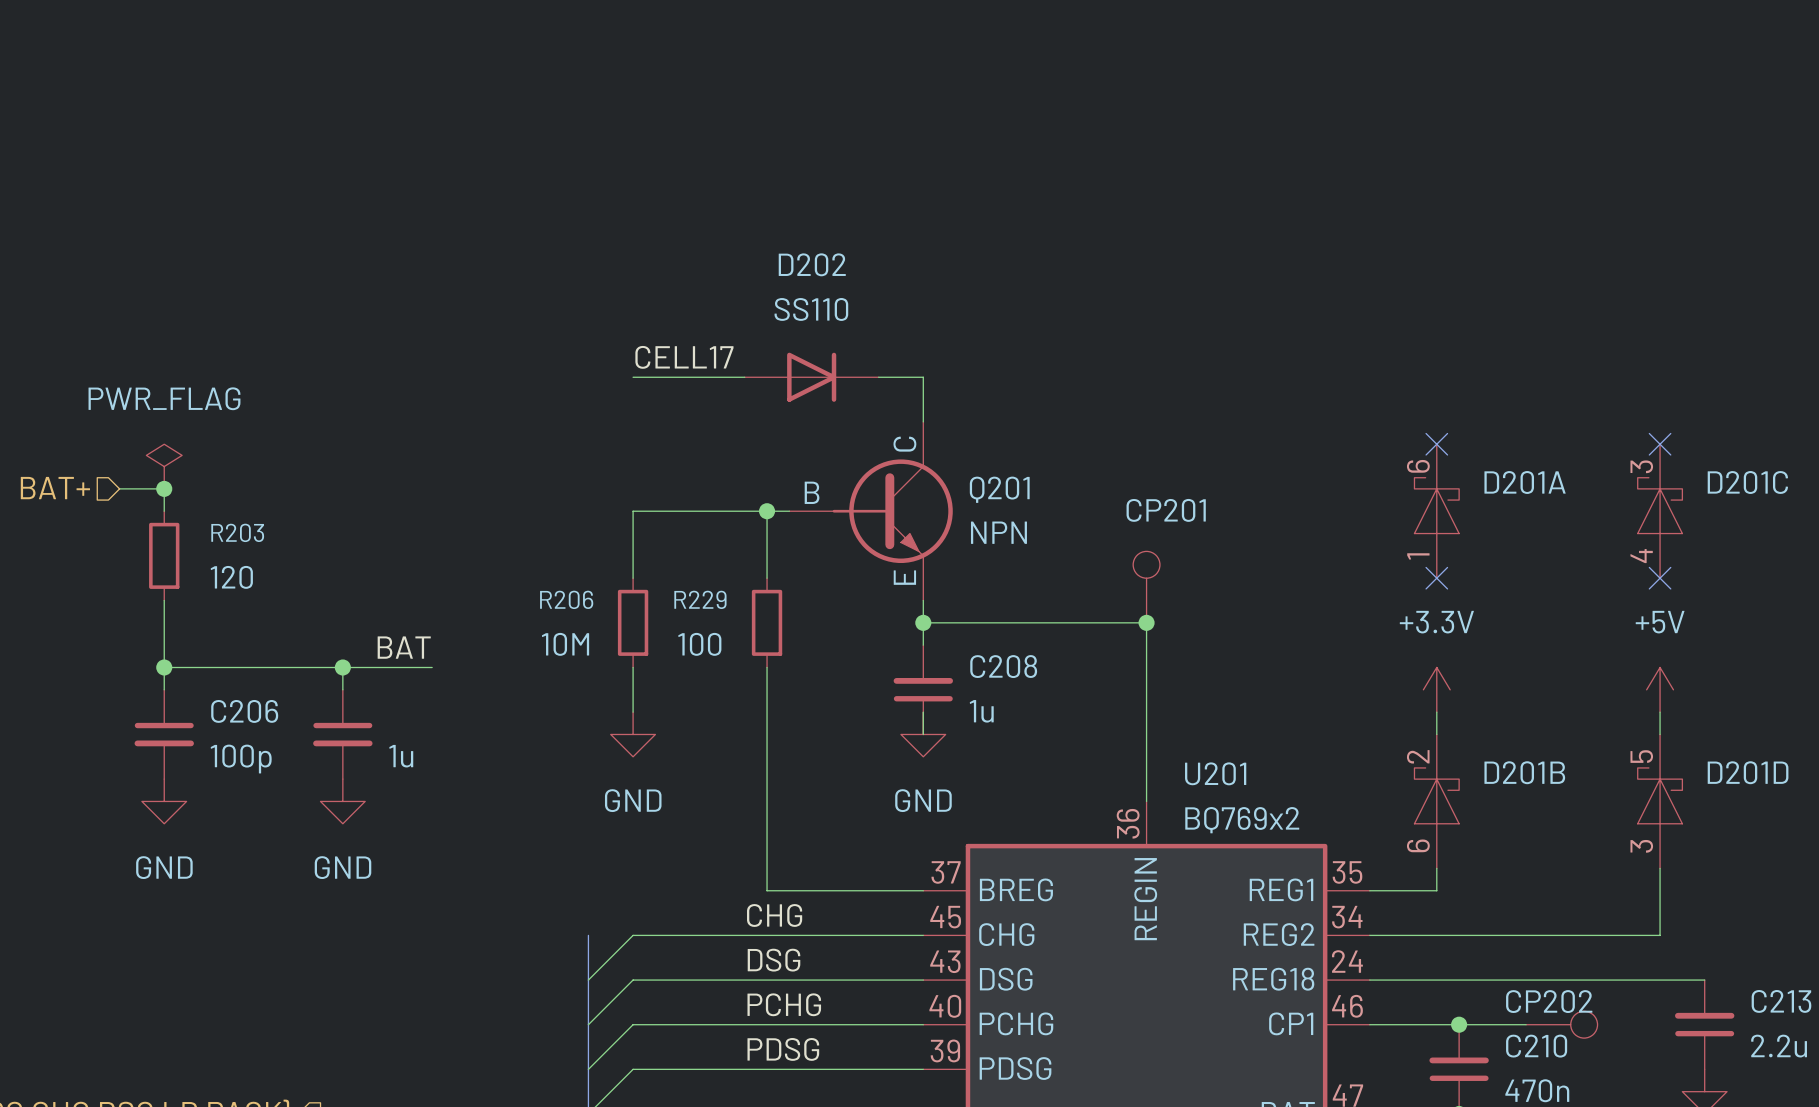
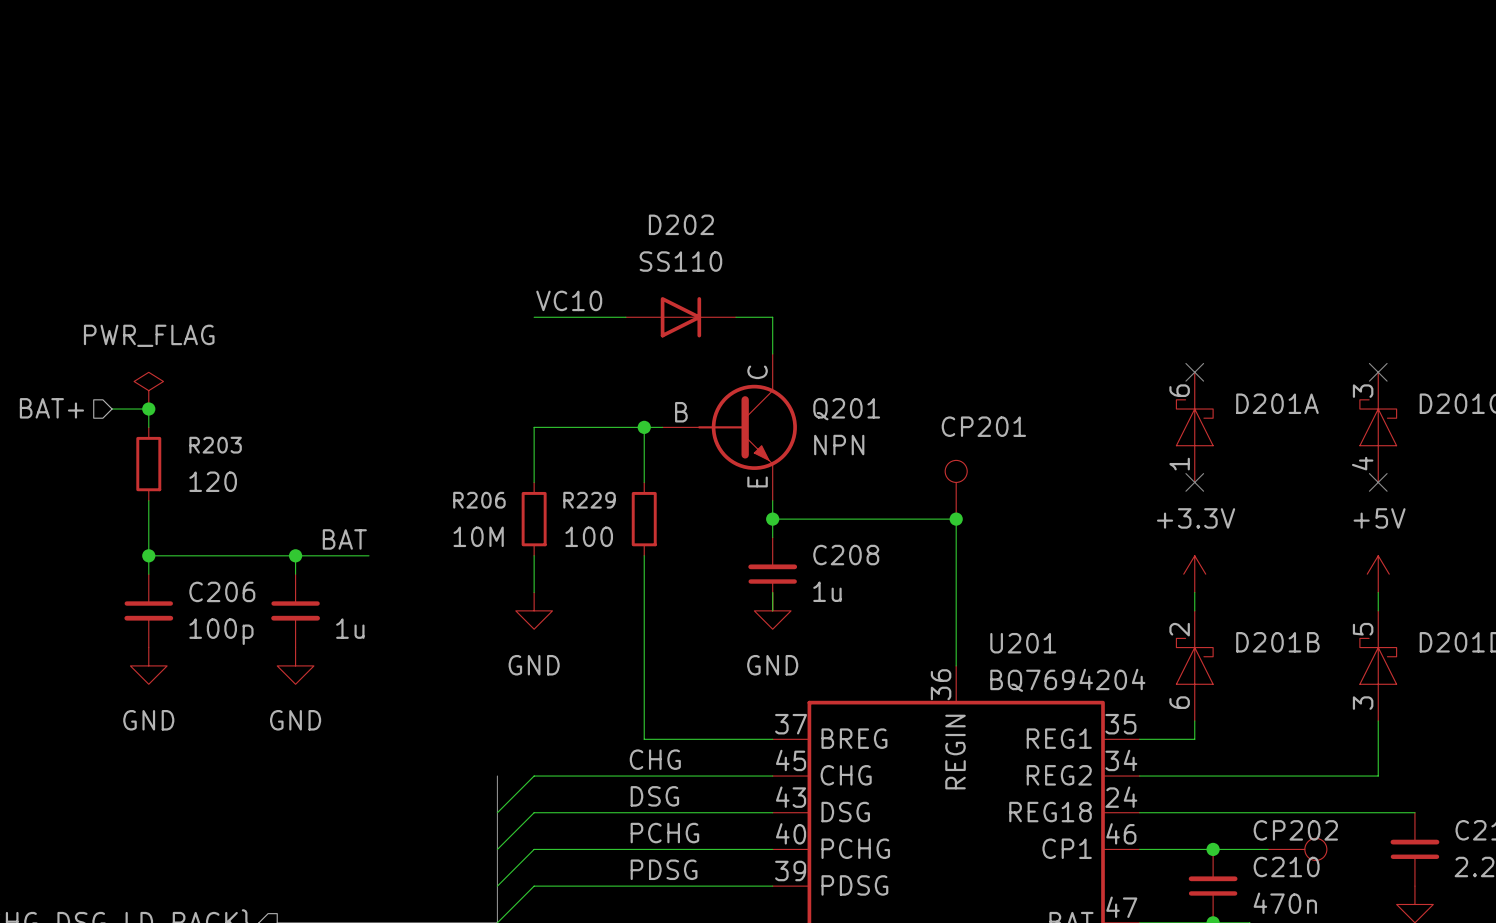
label: CELL17 (684, 357) -> VC10 (569, 300)
U201 value: BQ769x2 (1242, 820) -> BQ7694204 (1067, 680)

